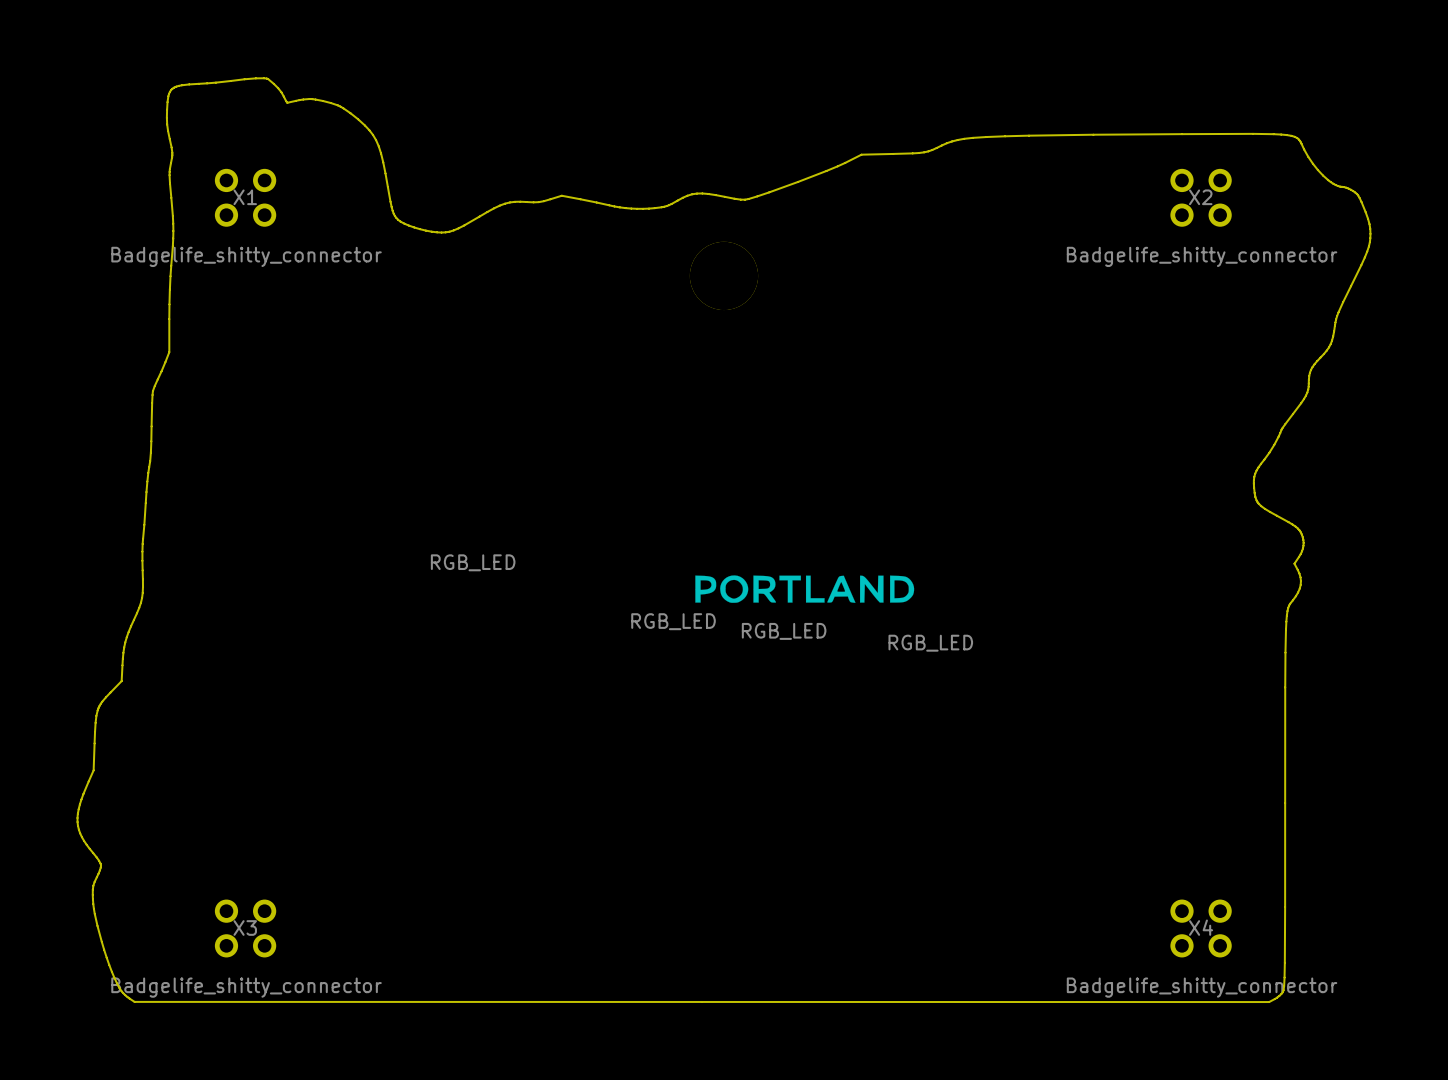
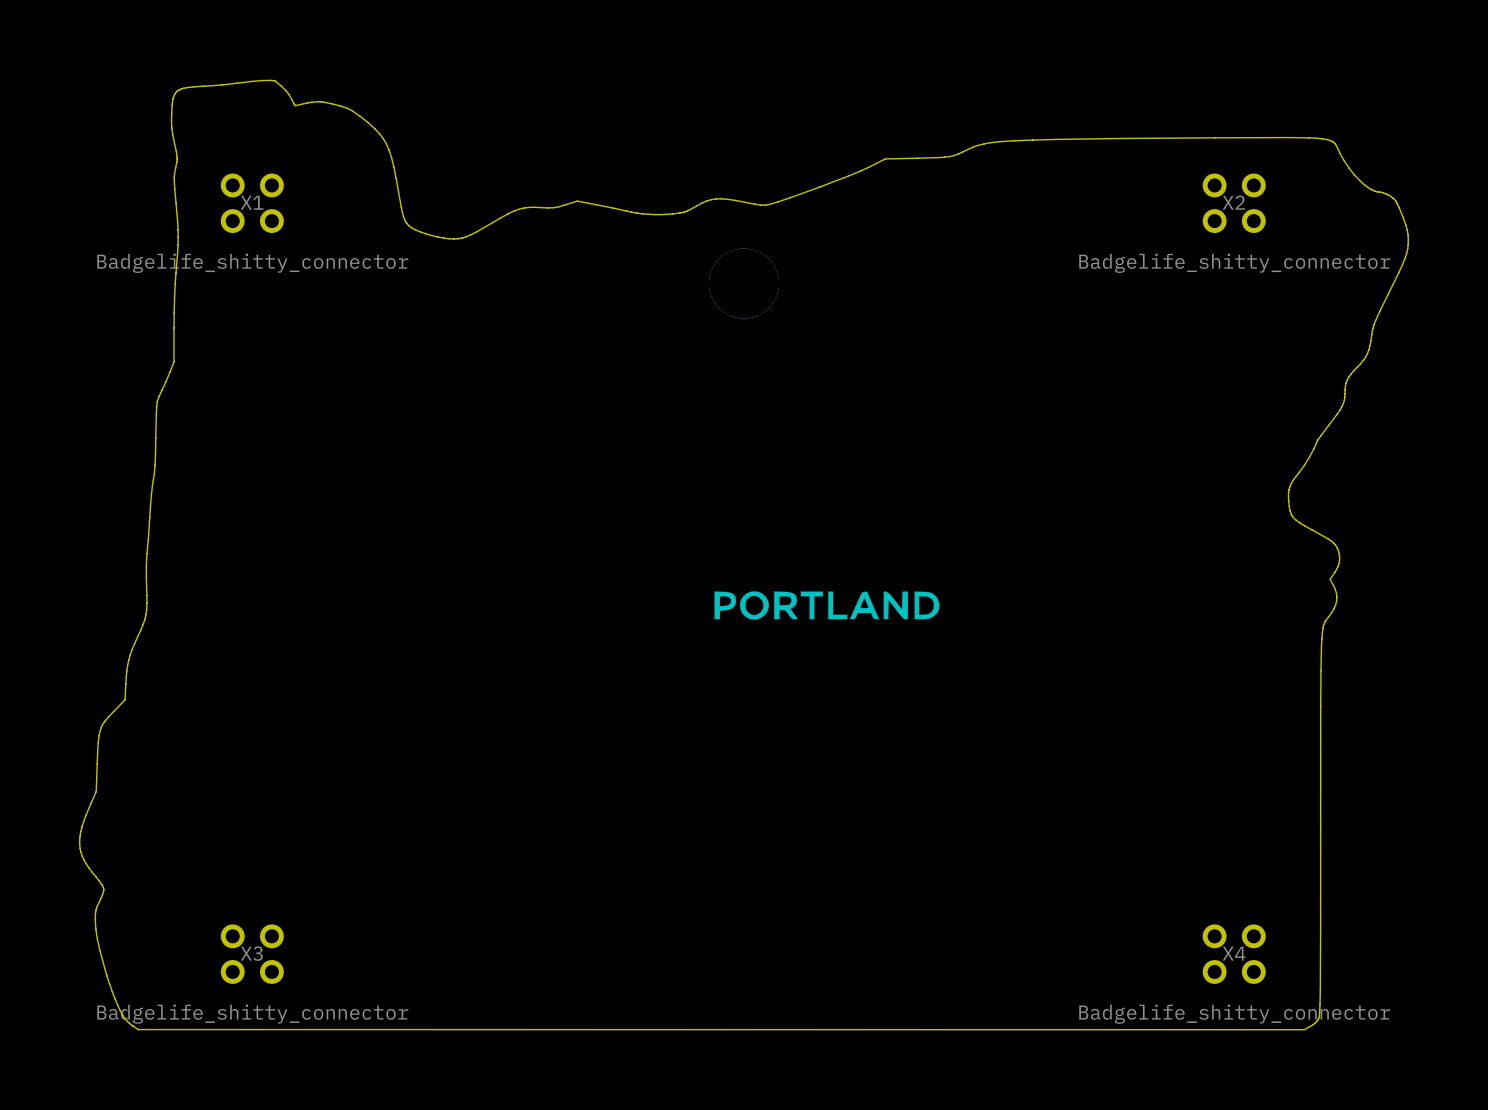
part: RGB_LED (473, 562) -> none
part: RGB_LED (673, 621) -> none
part: RGB_LED (784, 631) -> none
part: RGB_LED (930, 643) -> none

